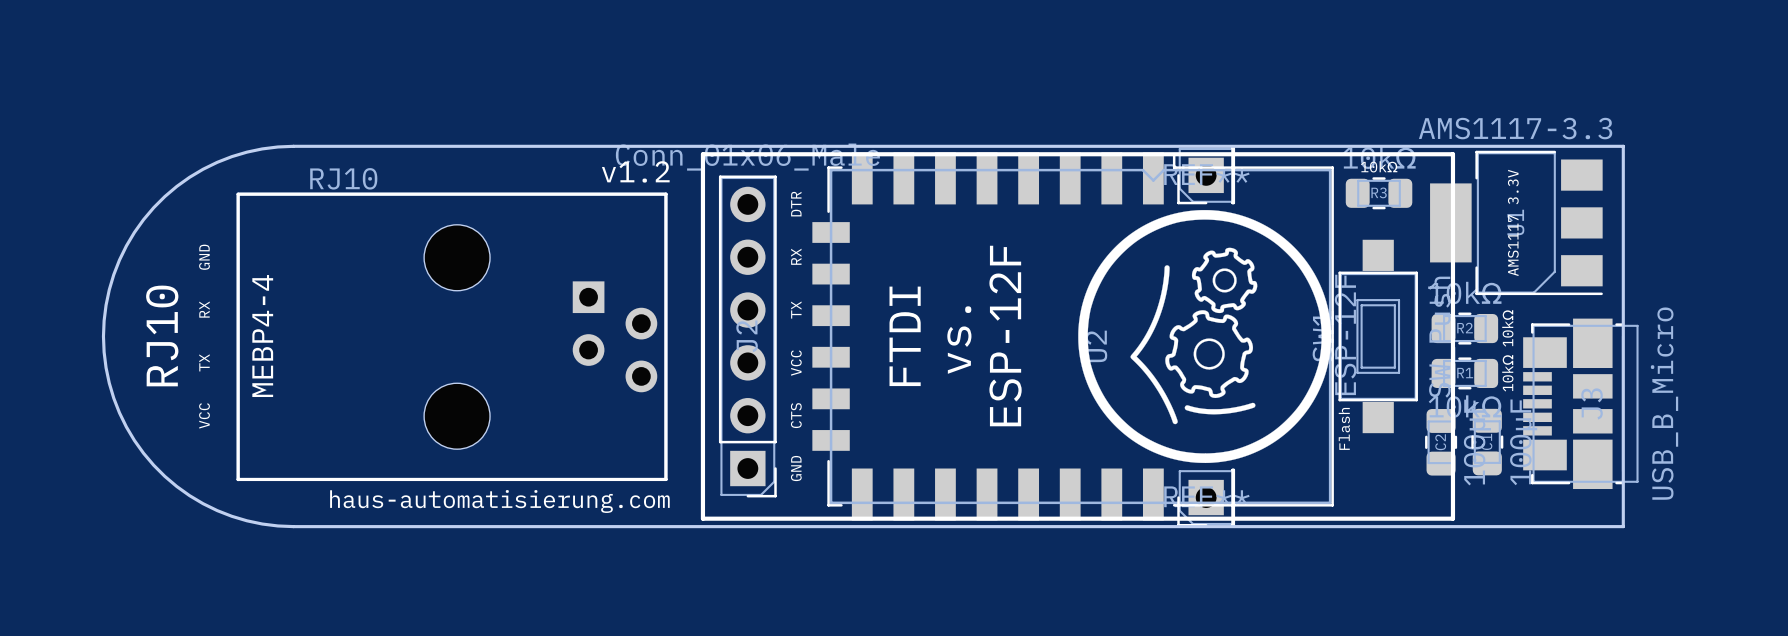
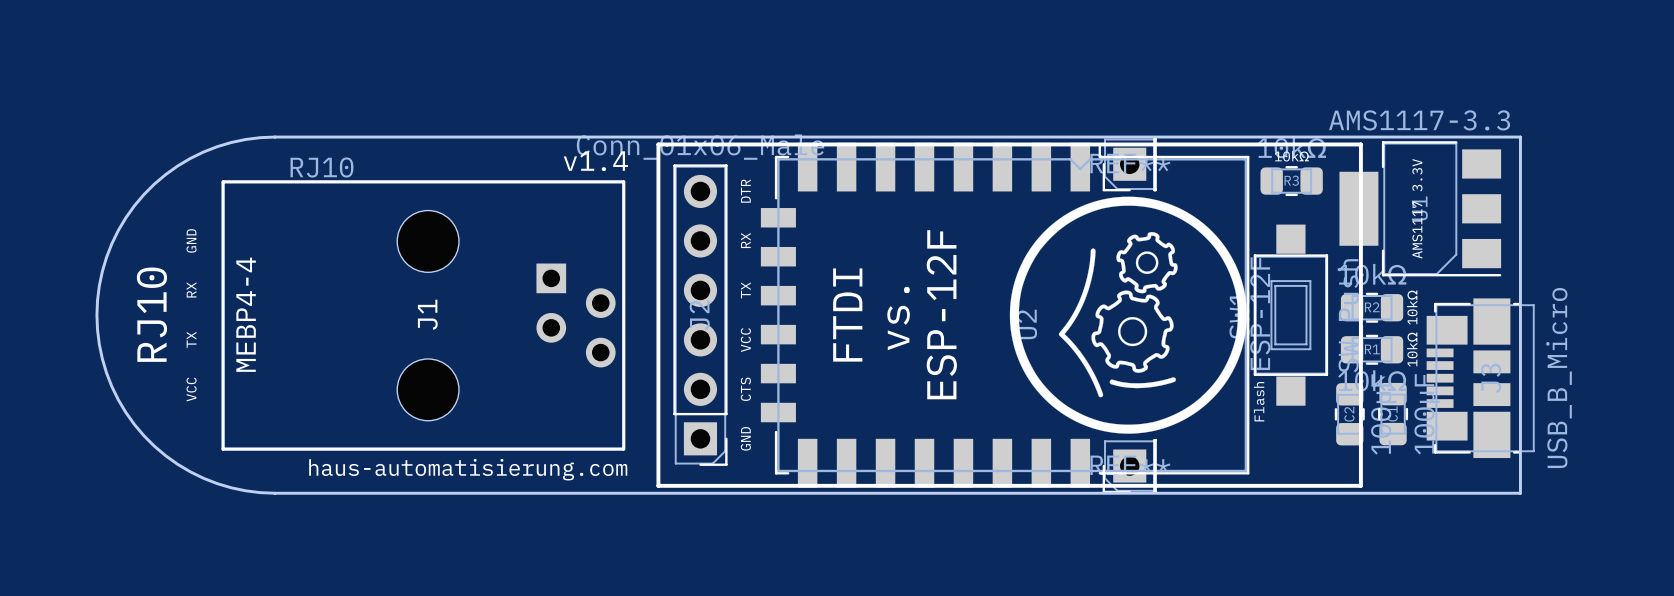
text: v1.2 (635, 171) -> v1.4 (595, 161)
J1 name: none -> J1 (427, 314)

